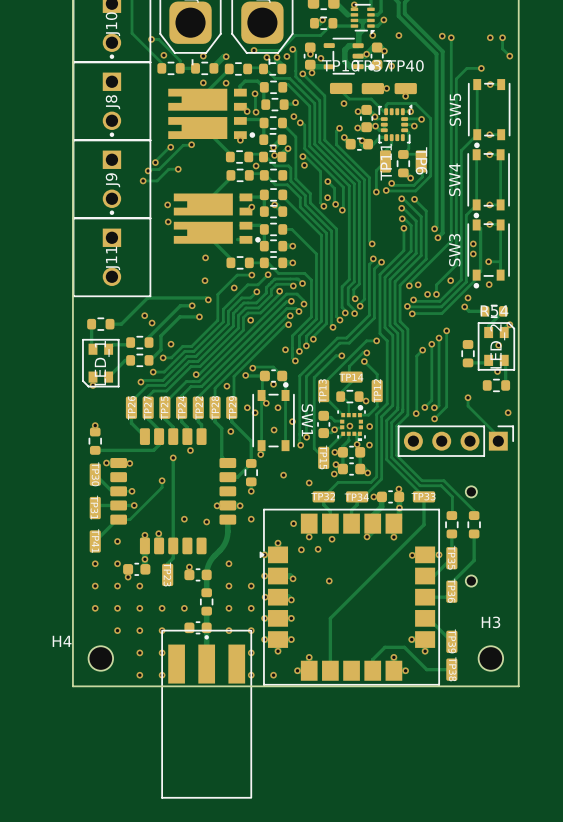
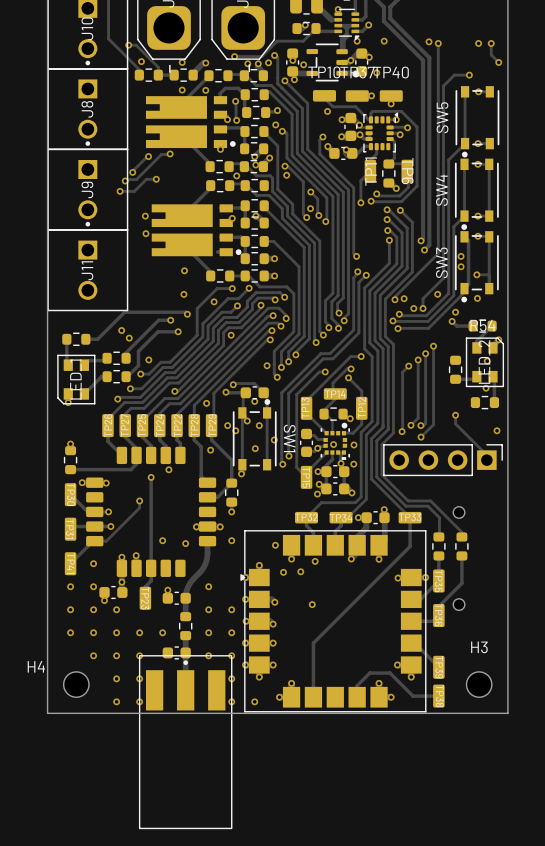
track: (358, 45) (349, 45) (344, 50) (344, 61) (350, 66) (358, 66) -> none
via: (283, 475) -> none
via: (309, 482) -> none
via: (399, 508) -> none

